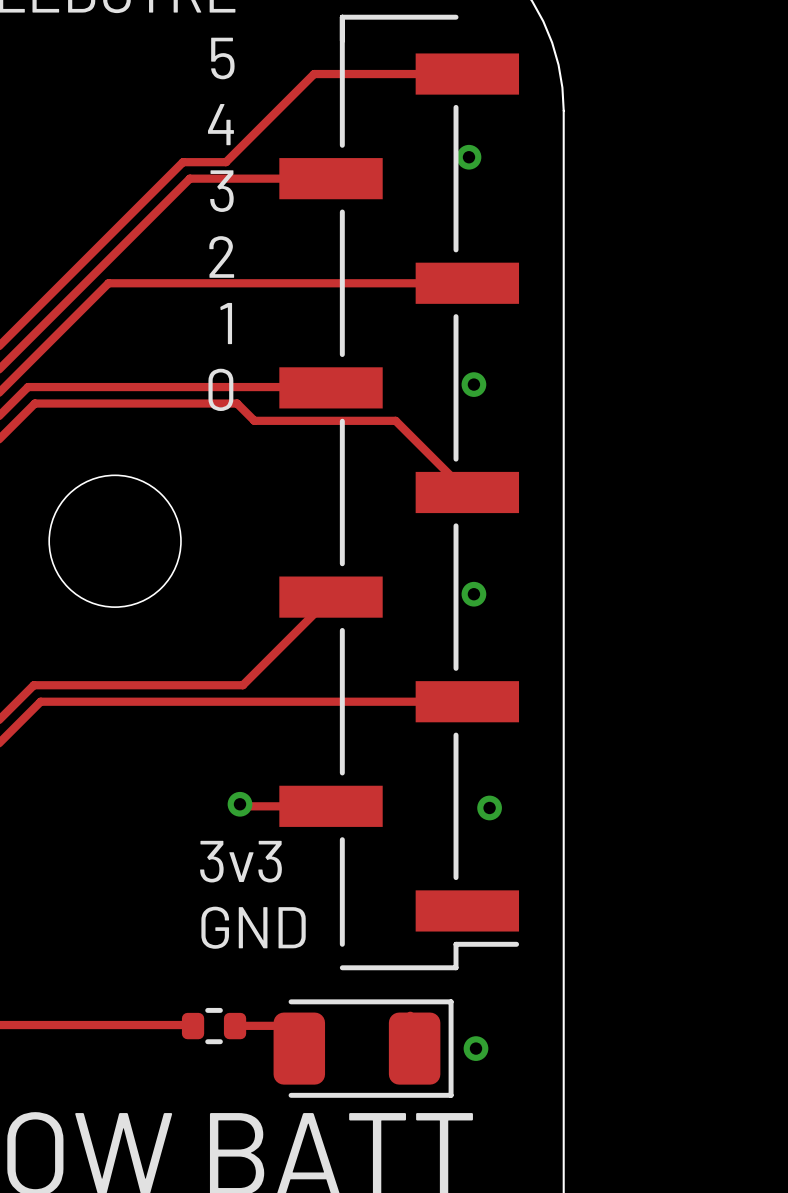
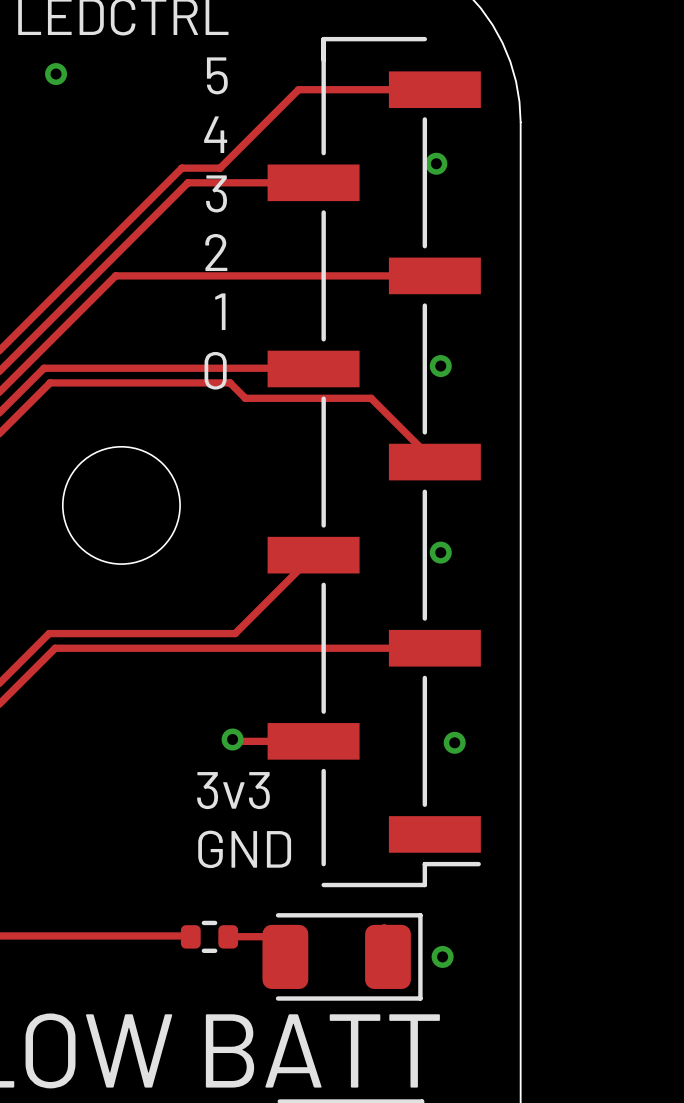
via: none -> (56, 74)

